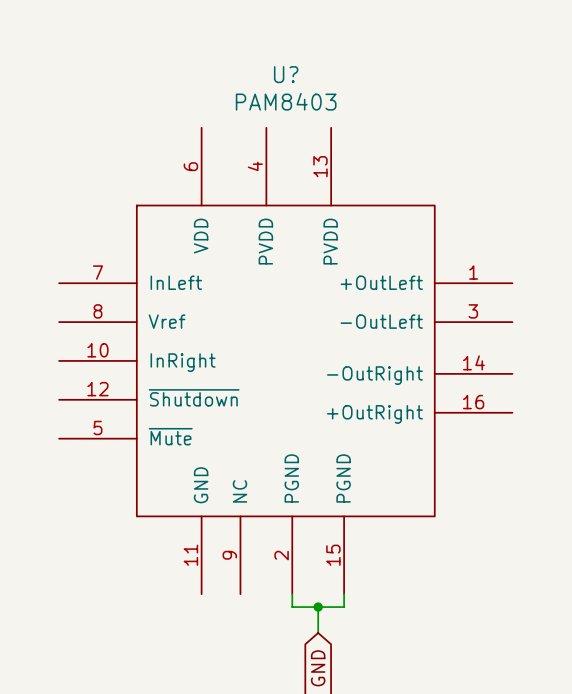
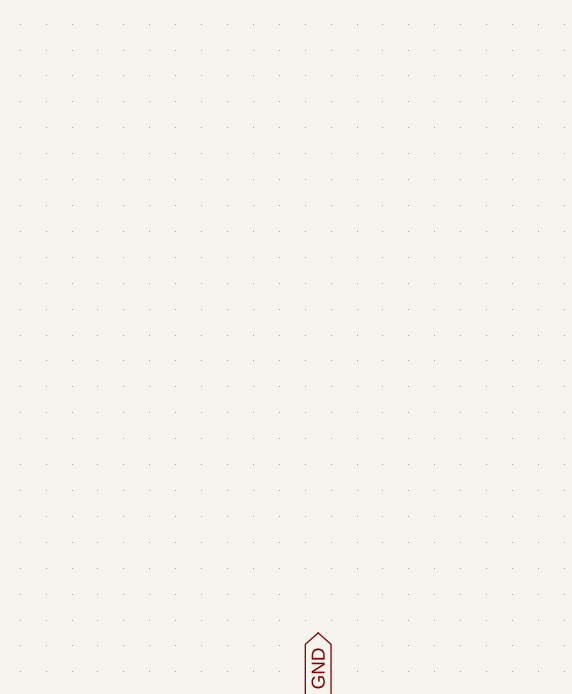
U?: PAM8403 (285, 360) -> none
wire: (292, 594) (292, 607) (344, 607) (344, 594) -> none
wire: (318, 607) (318, 632) -> none
junction: (318, 607) -> none

